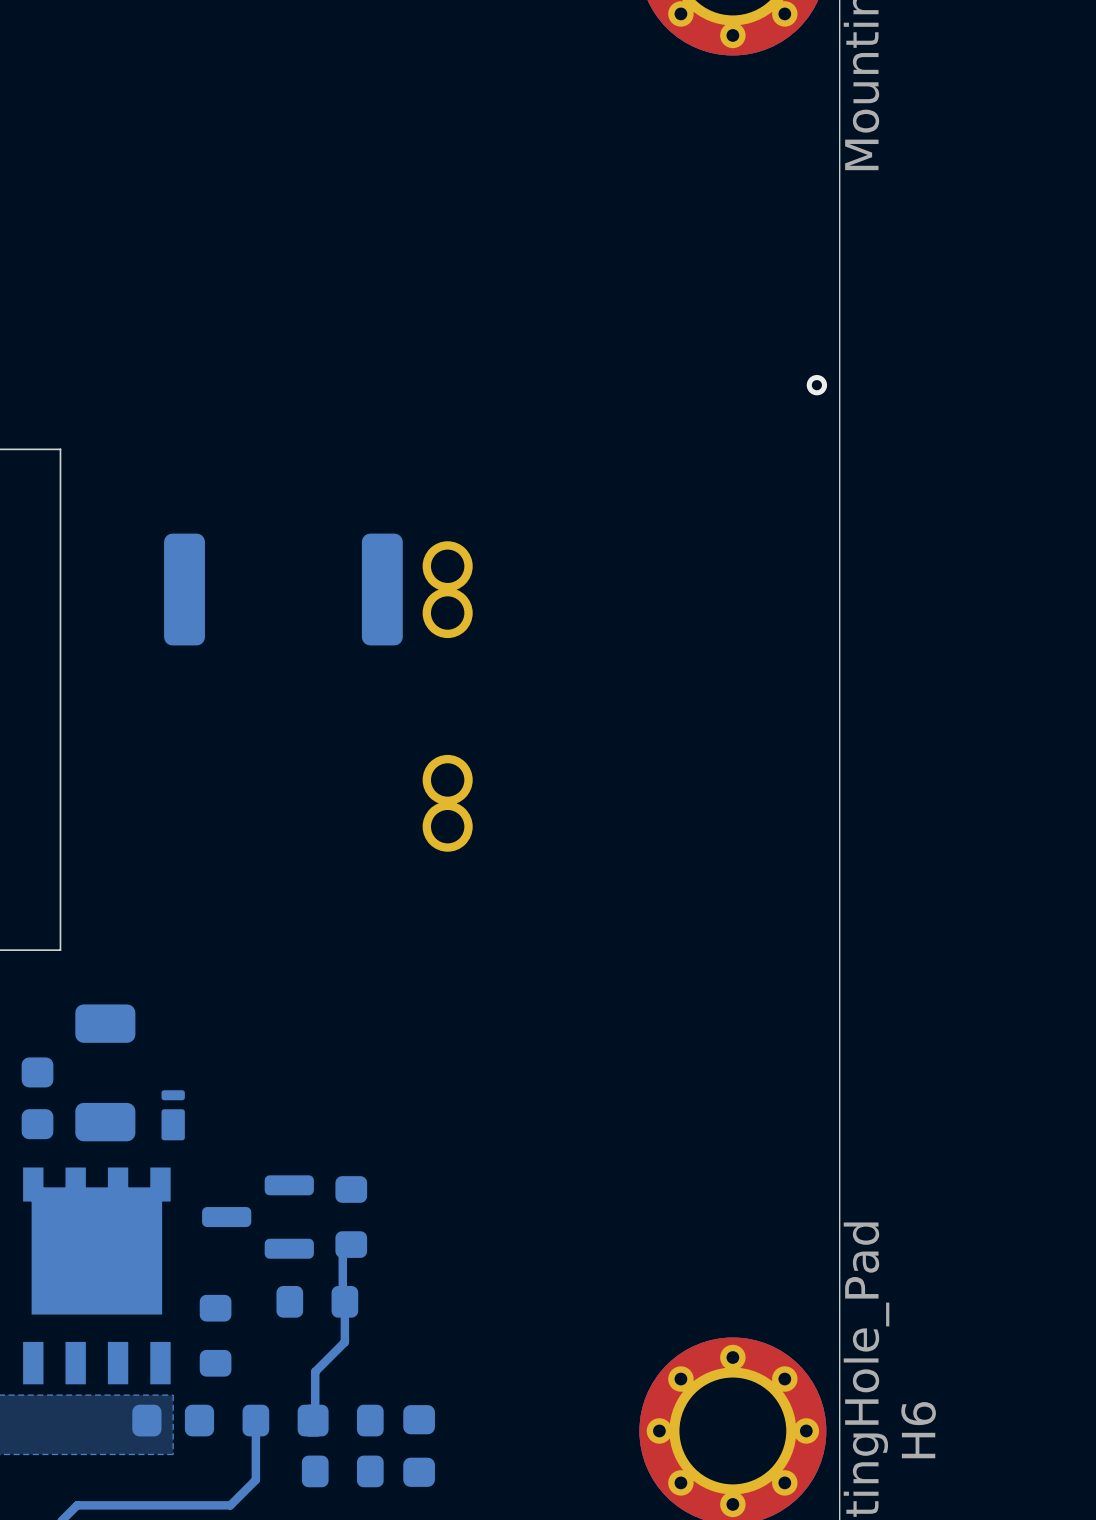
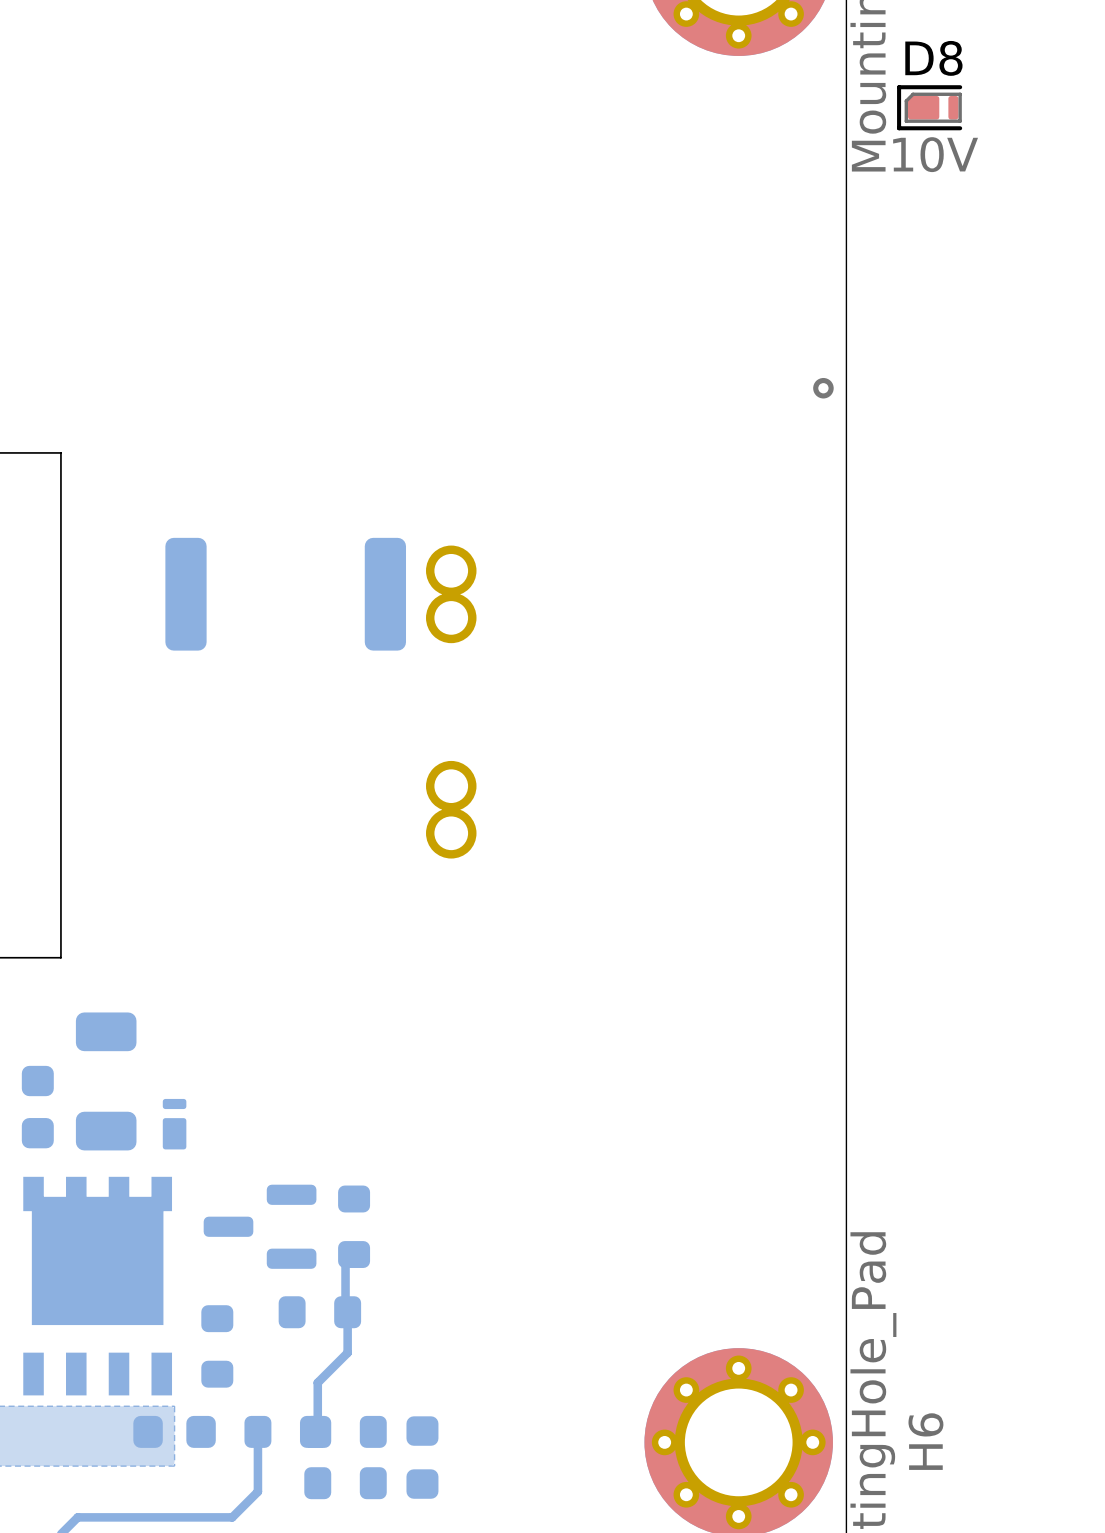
D8: none -> 10V (929, 107)

